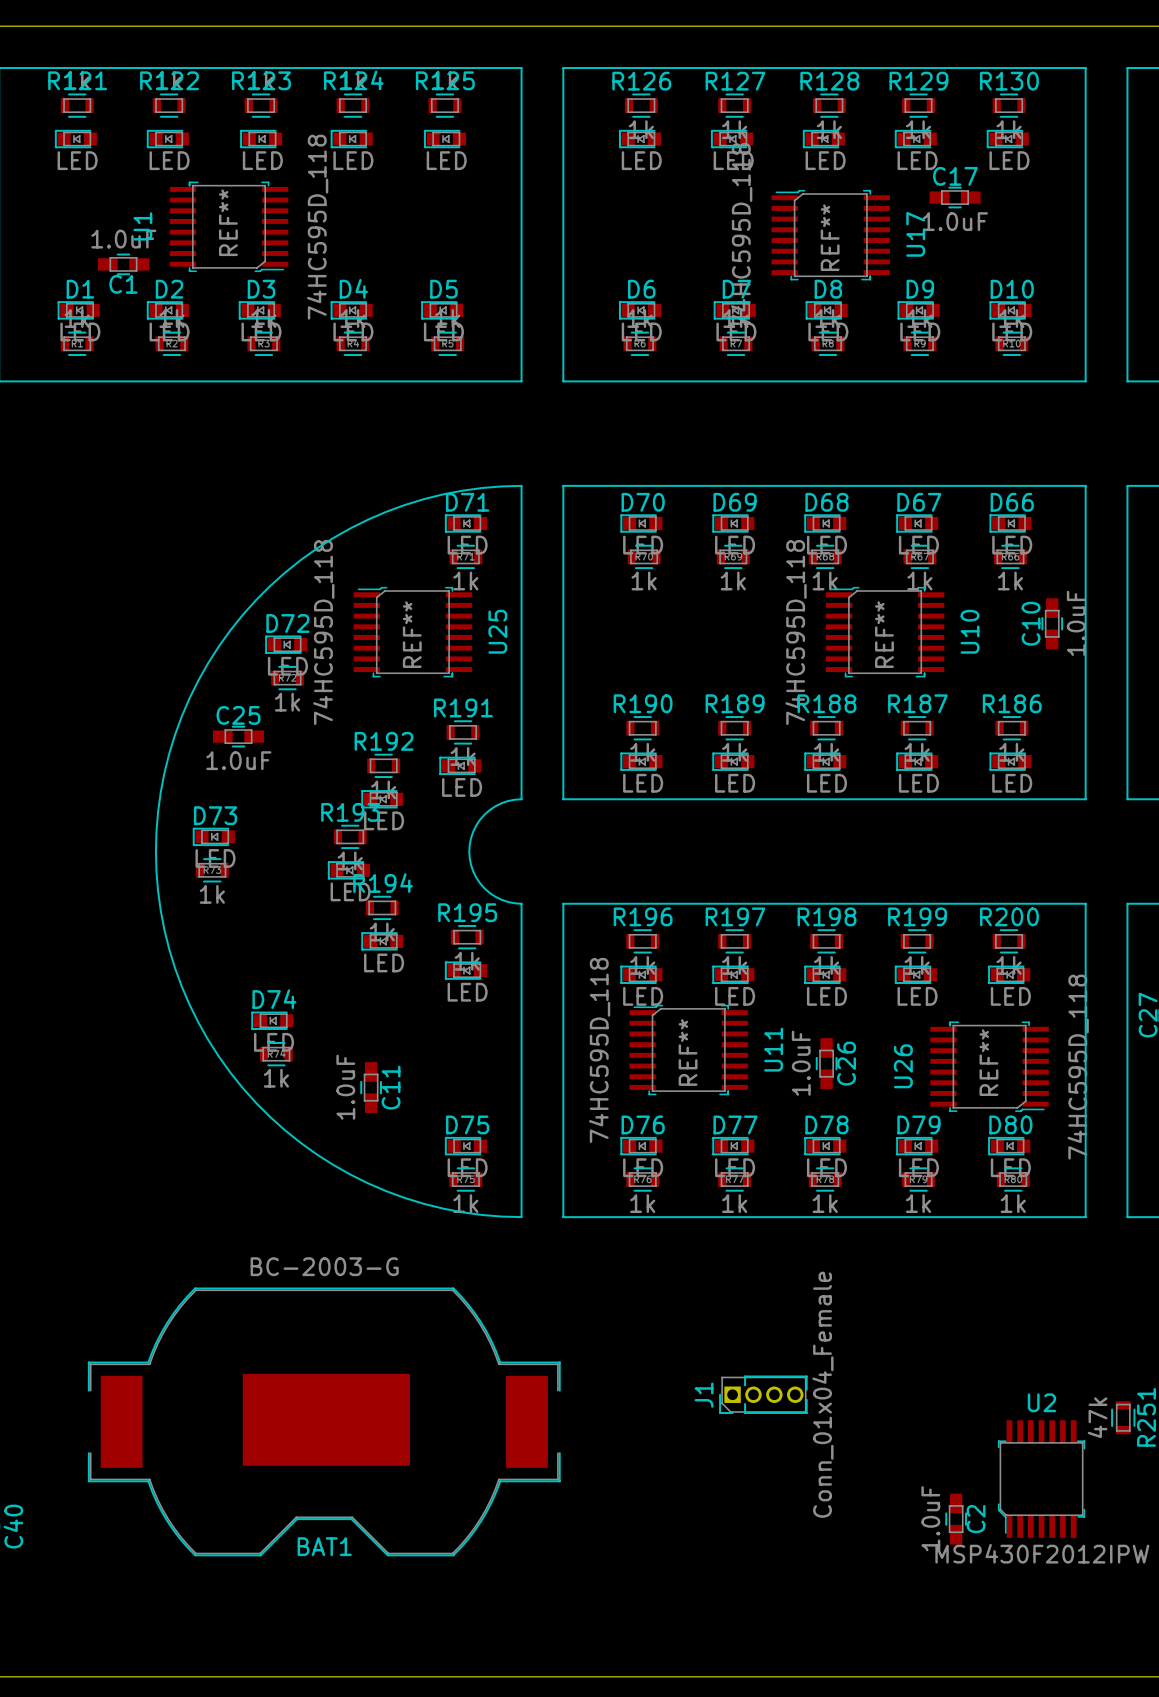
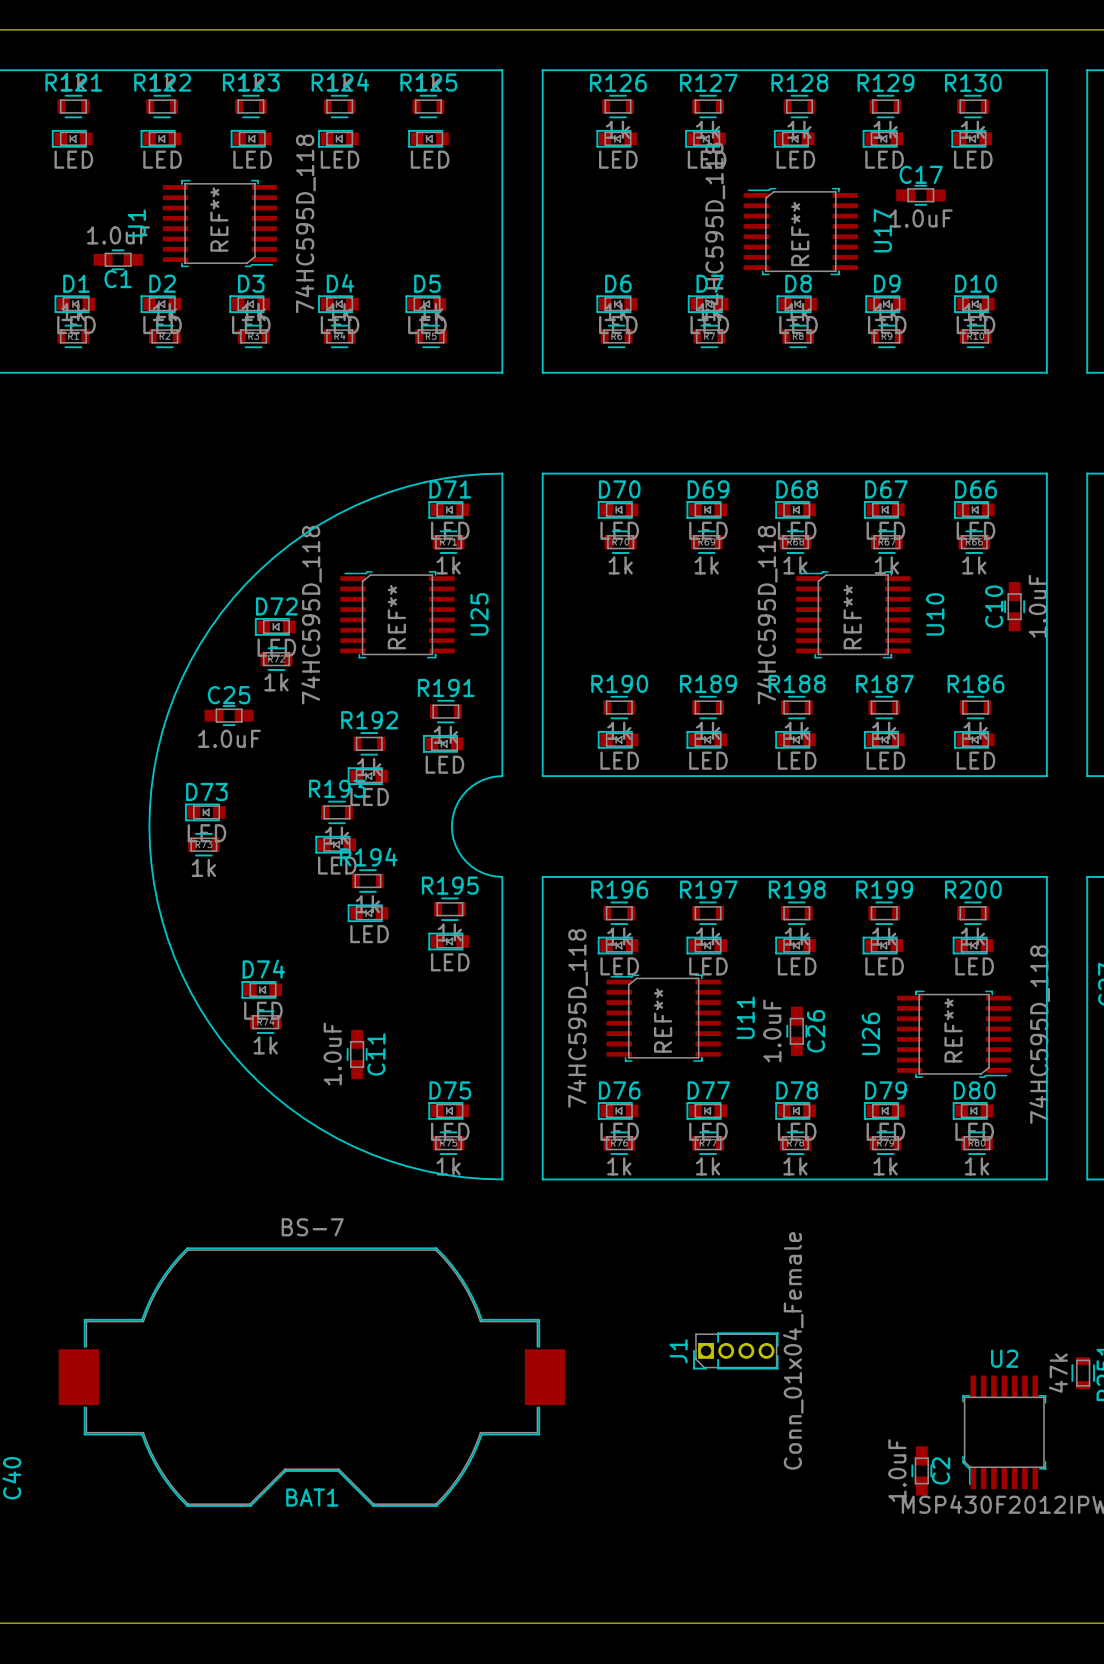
BAT1 value: BC-2003-G (324, 1266) -> BS-7 (312, 1227)
BAT1 footprint: [87, 1287, 561, 1557] -> [58, 1247, 566, 1507]

